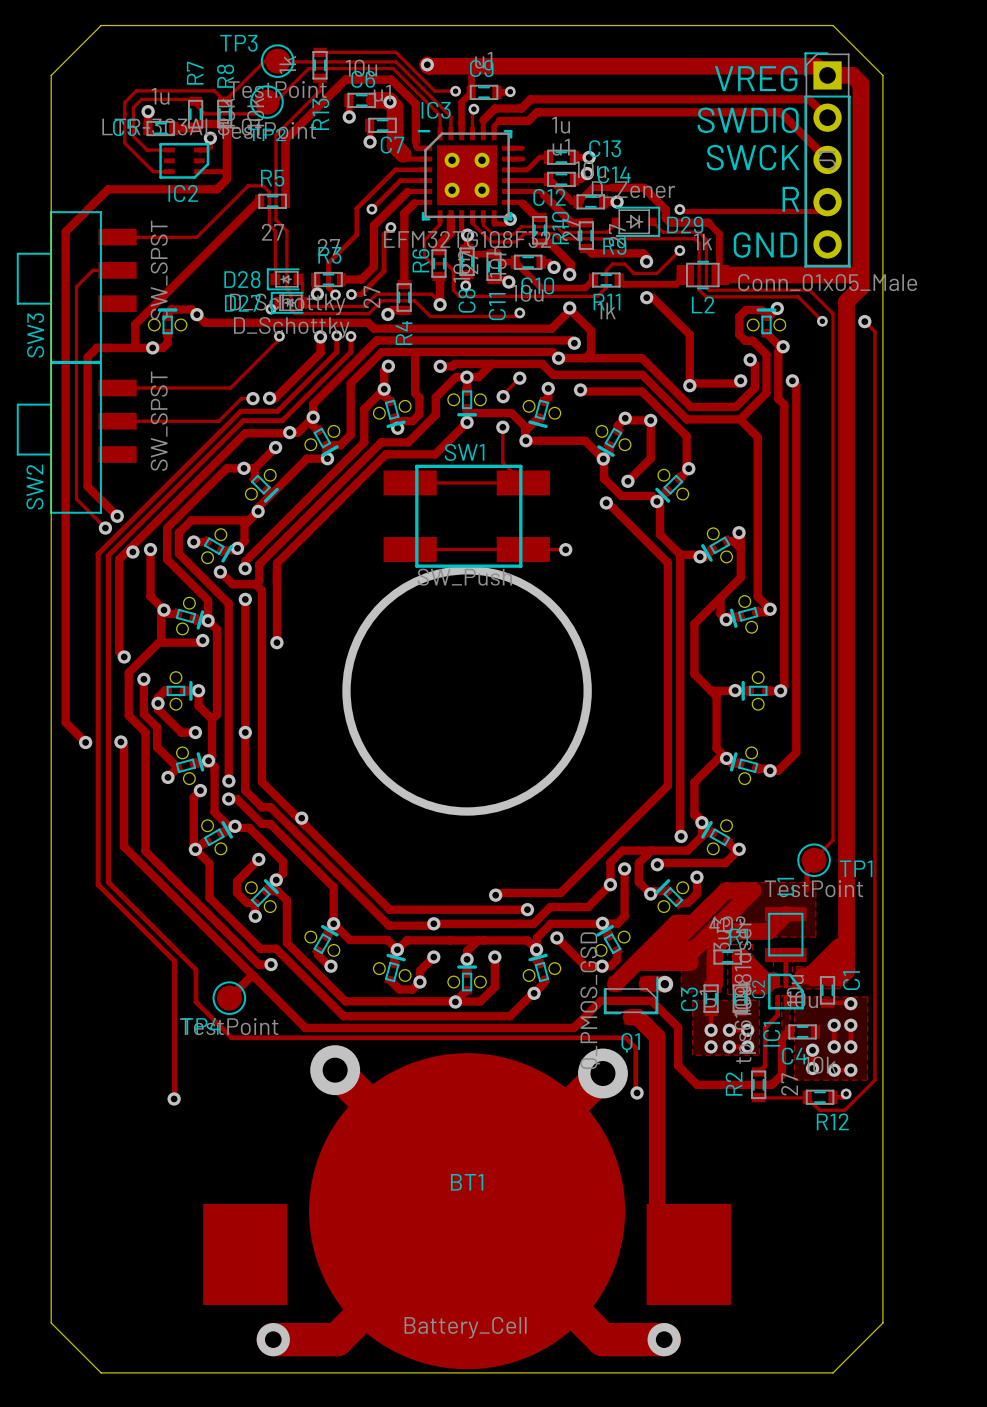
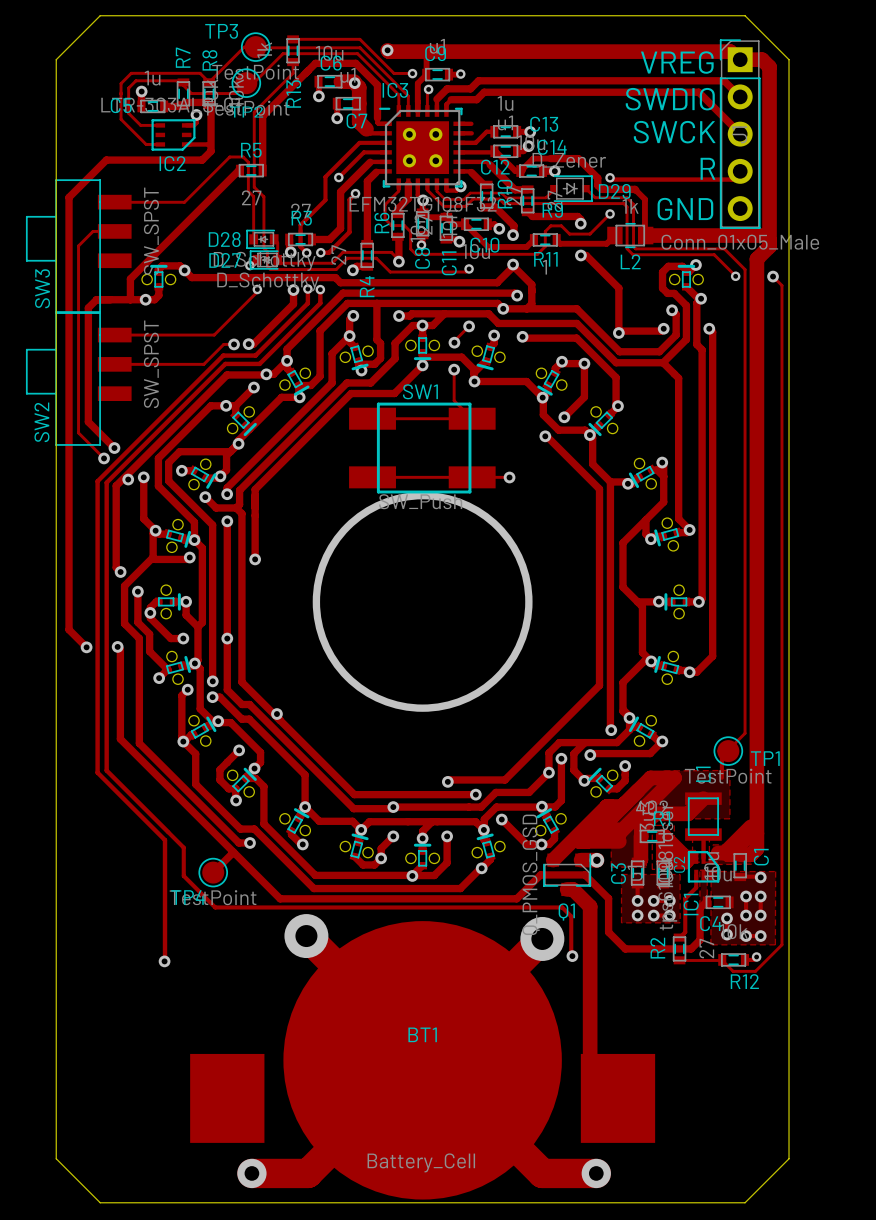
R11 value: 1k (606, 311) -> 1 (544, 267)

